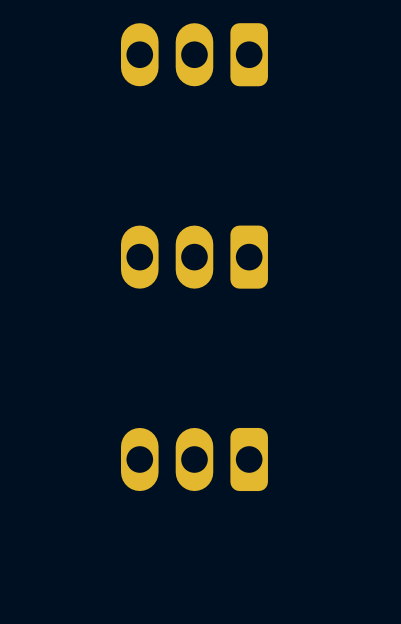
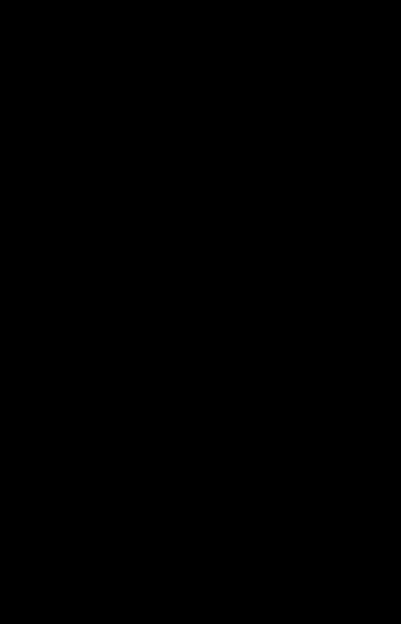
part: (194, 54) -> none
part: (194, 257) -> none
part: (194, 459) -> none

